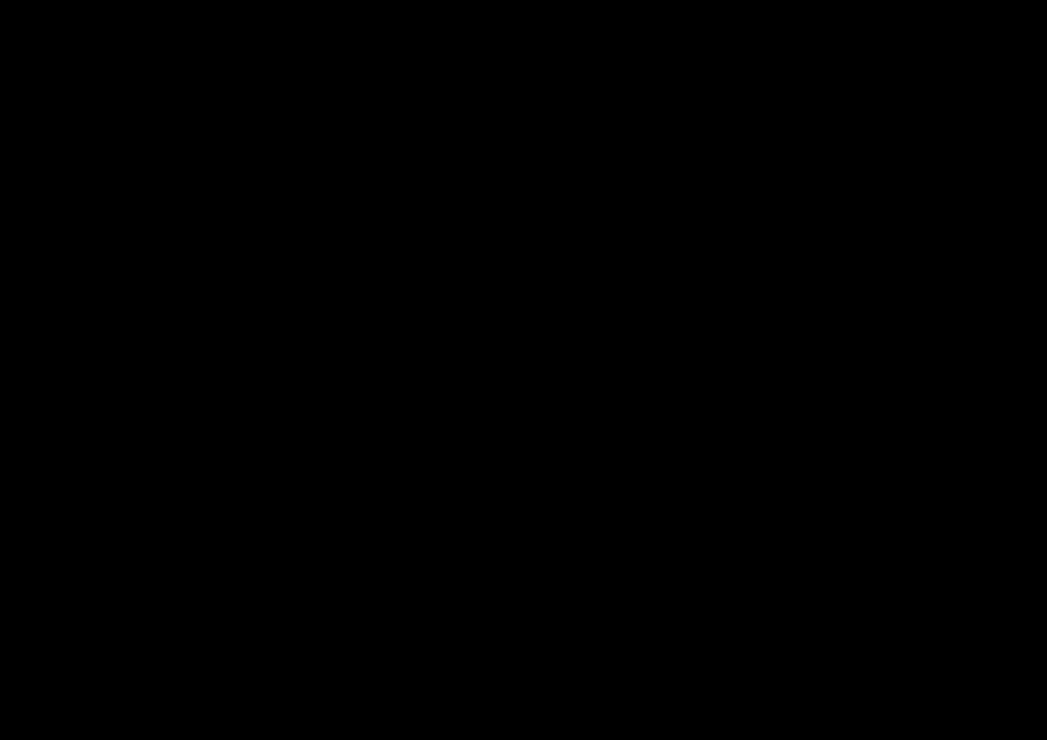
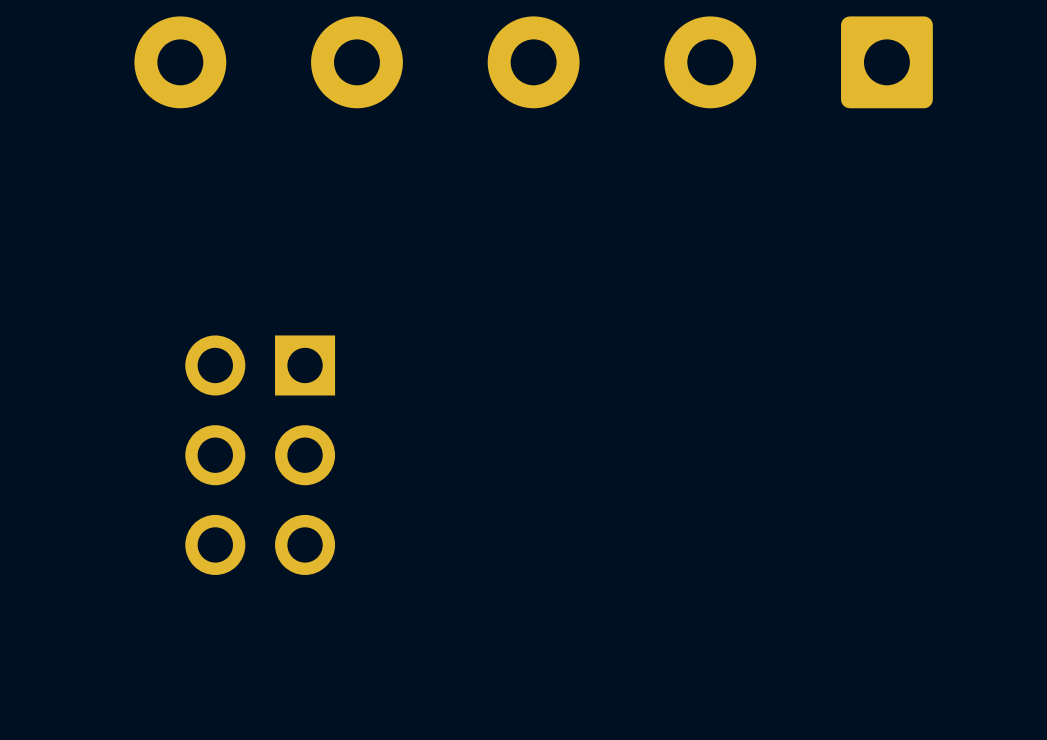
part: none -> (533, 62)
part: none -> (260, 455)

